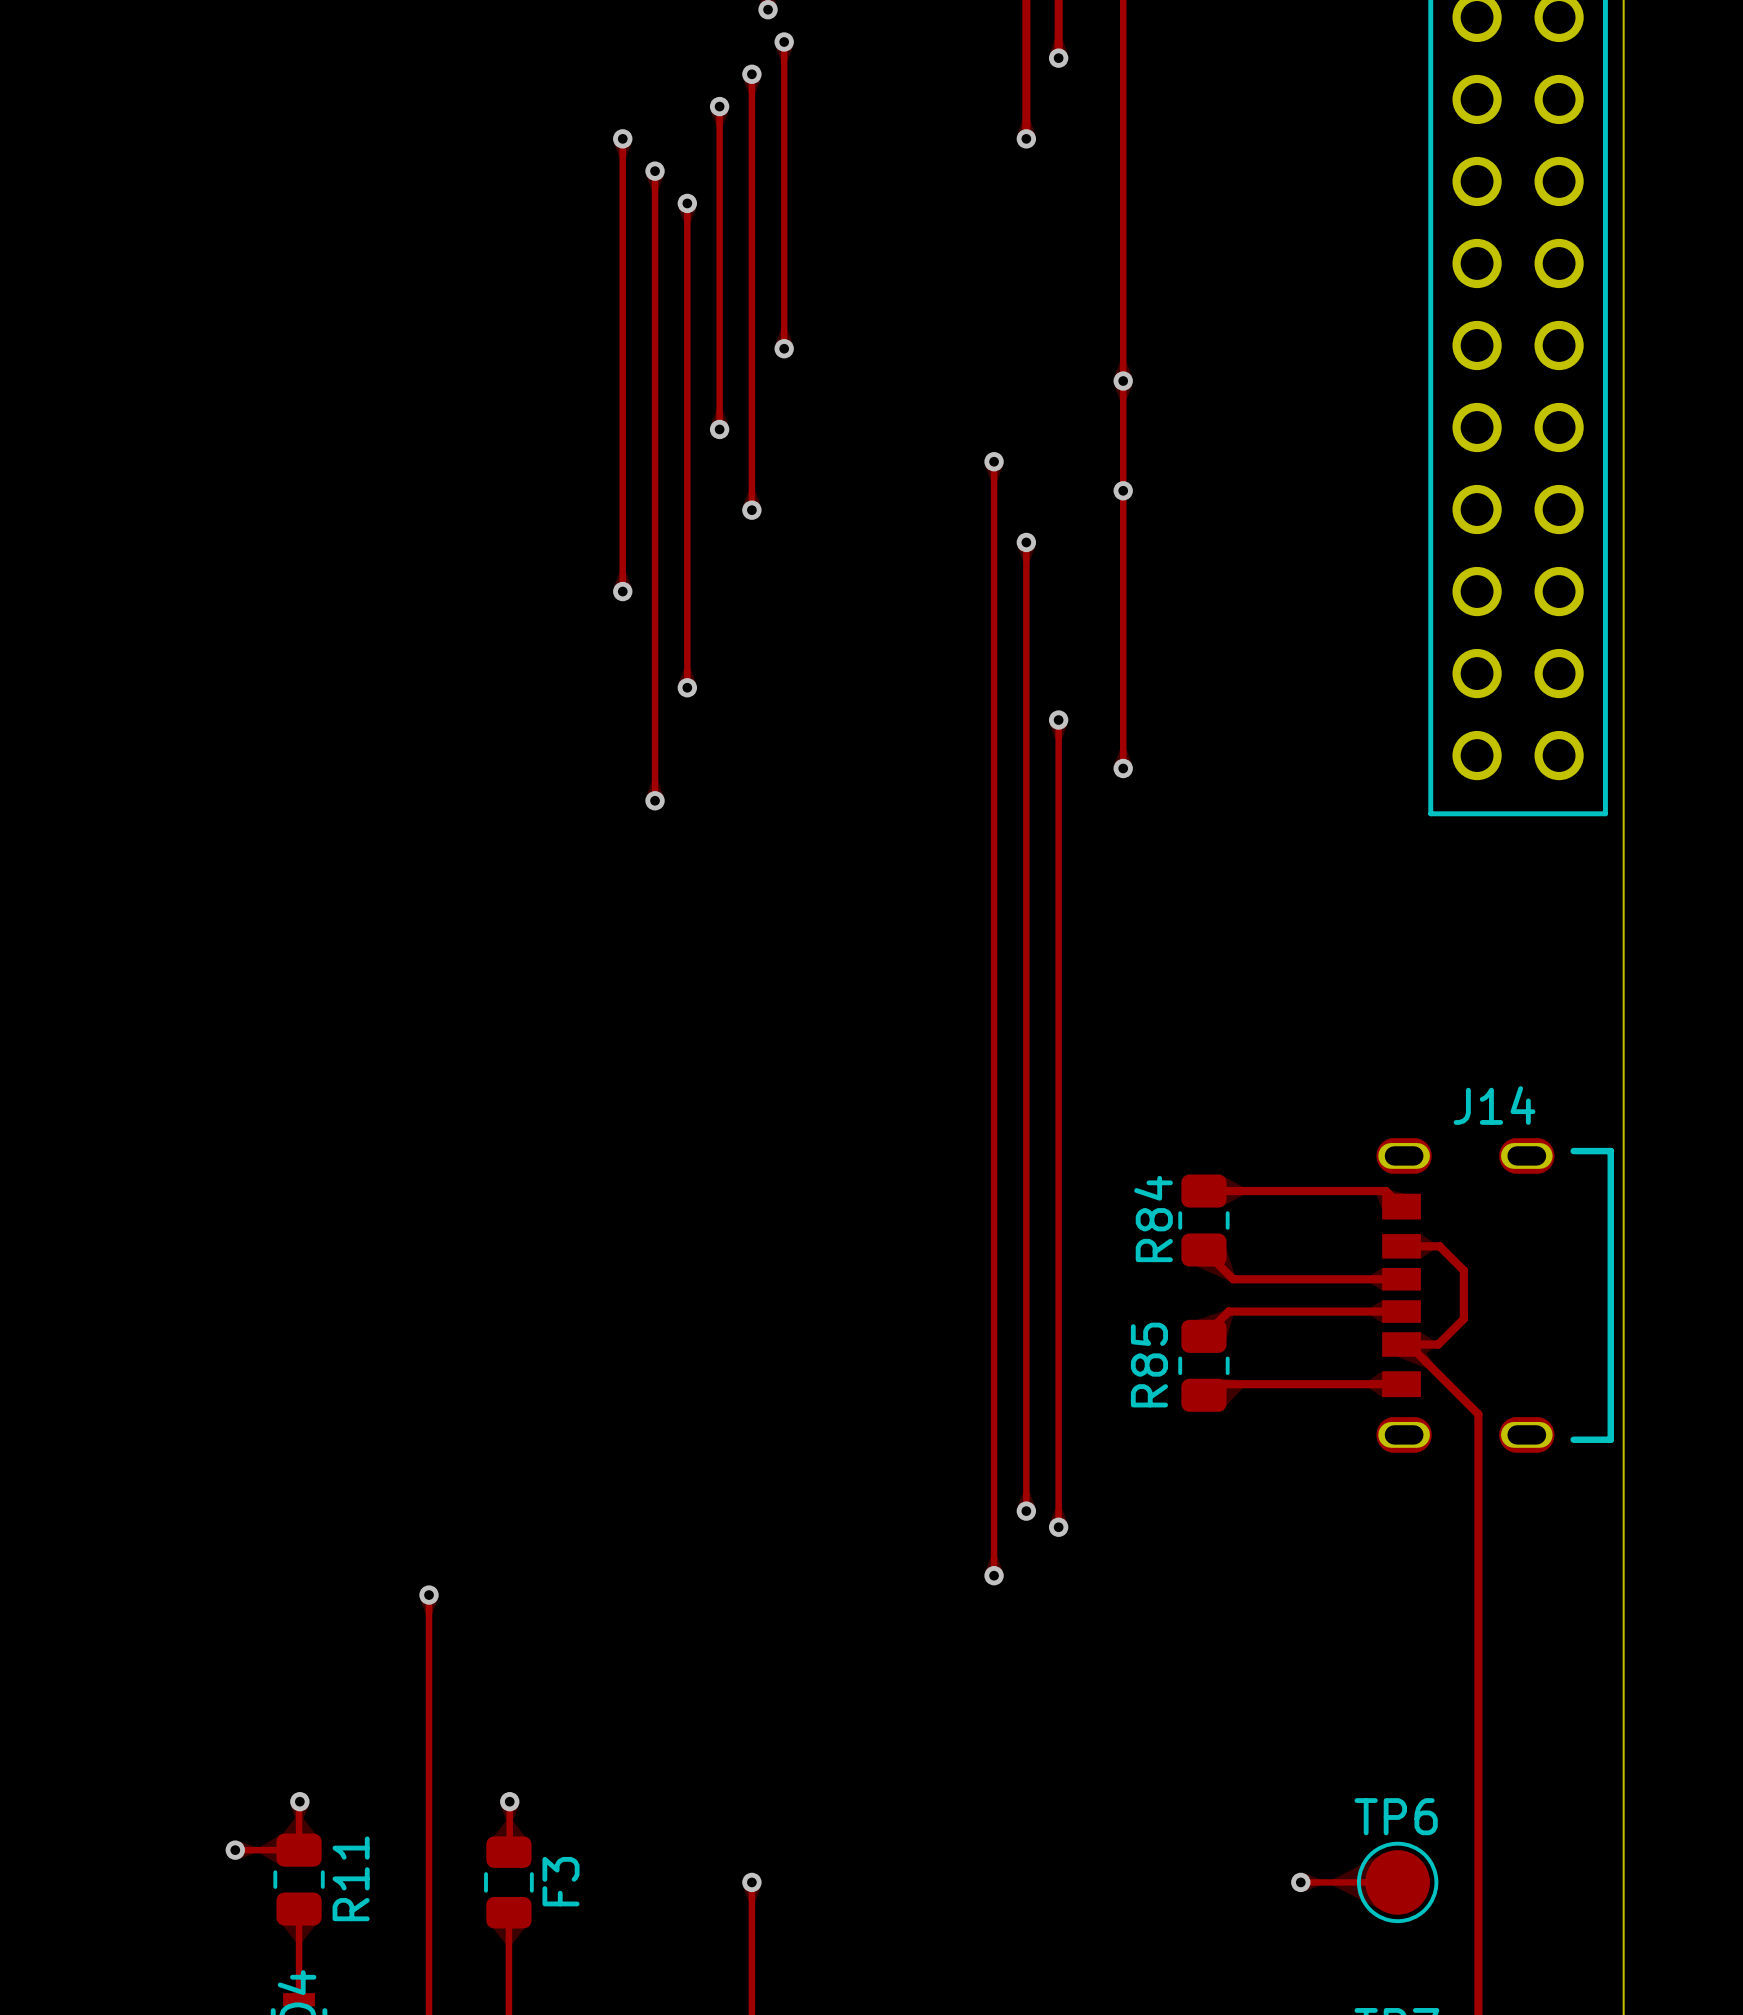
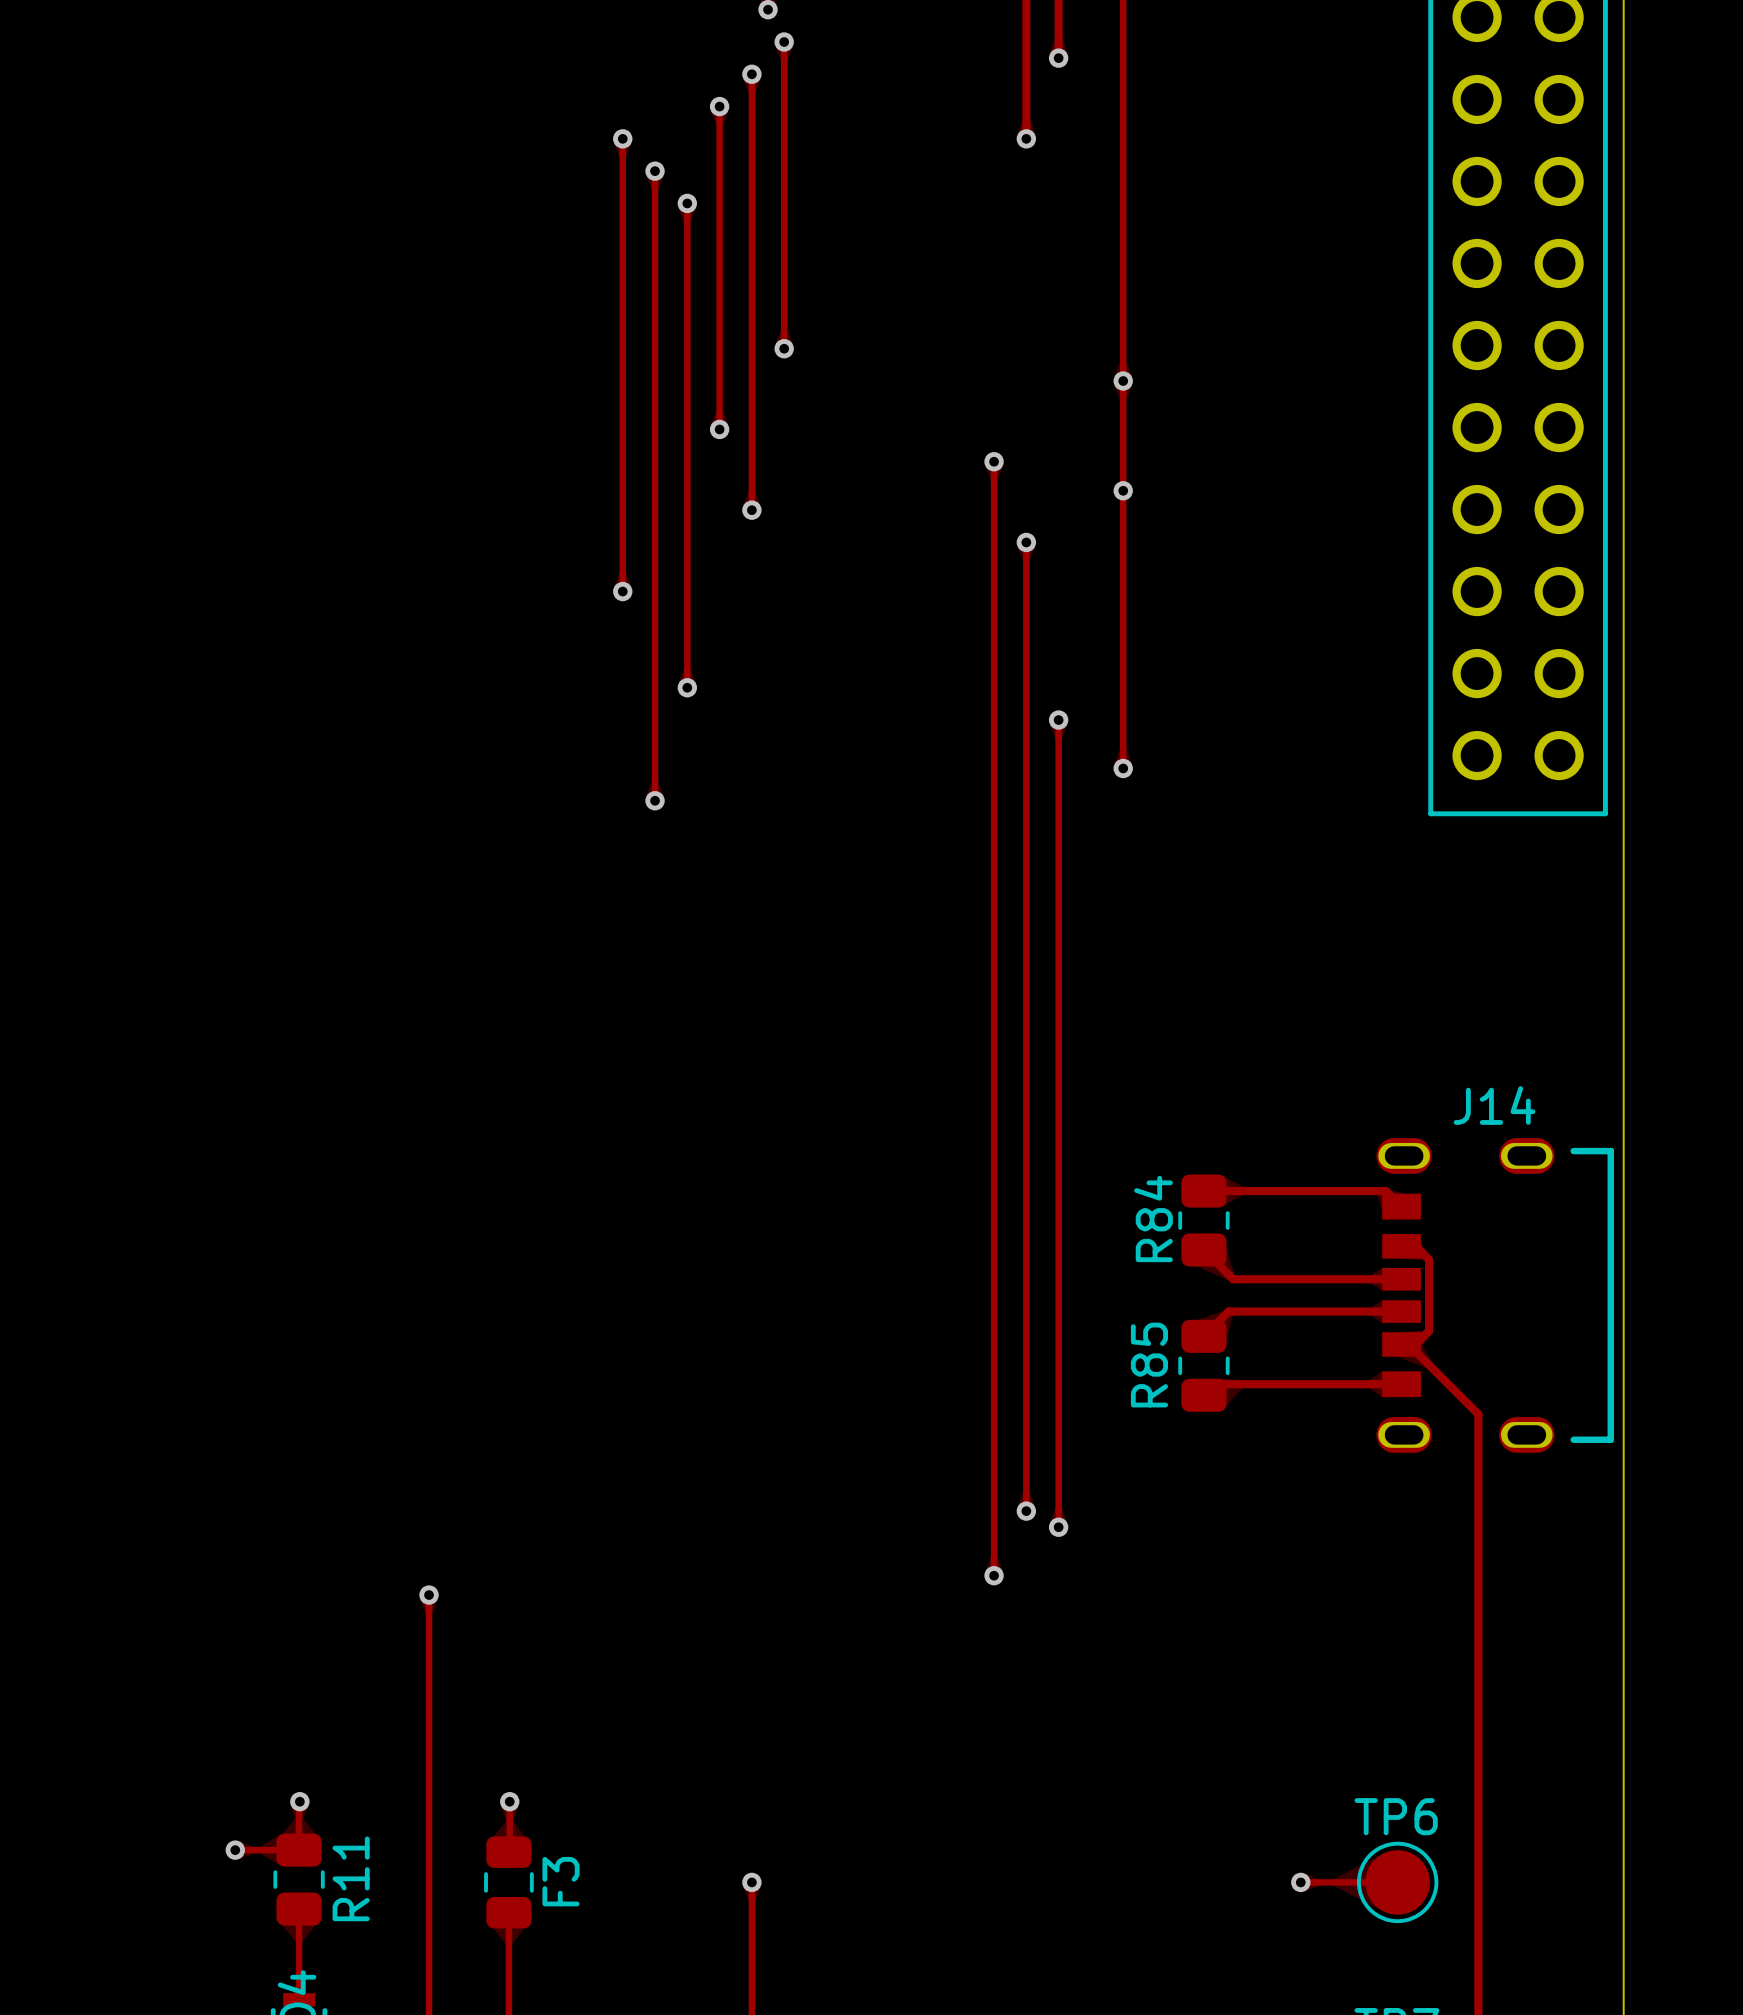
track: (1415, 1246) (1439, 1246) (1463, 1270) (1463, 1318) (1438, 1344) (1415, 1344) -> (1415, 1246) (1429, 1259) (1429, 1331) (1415, 1344)

